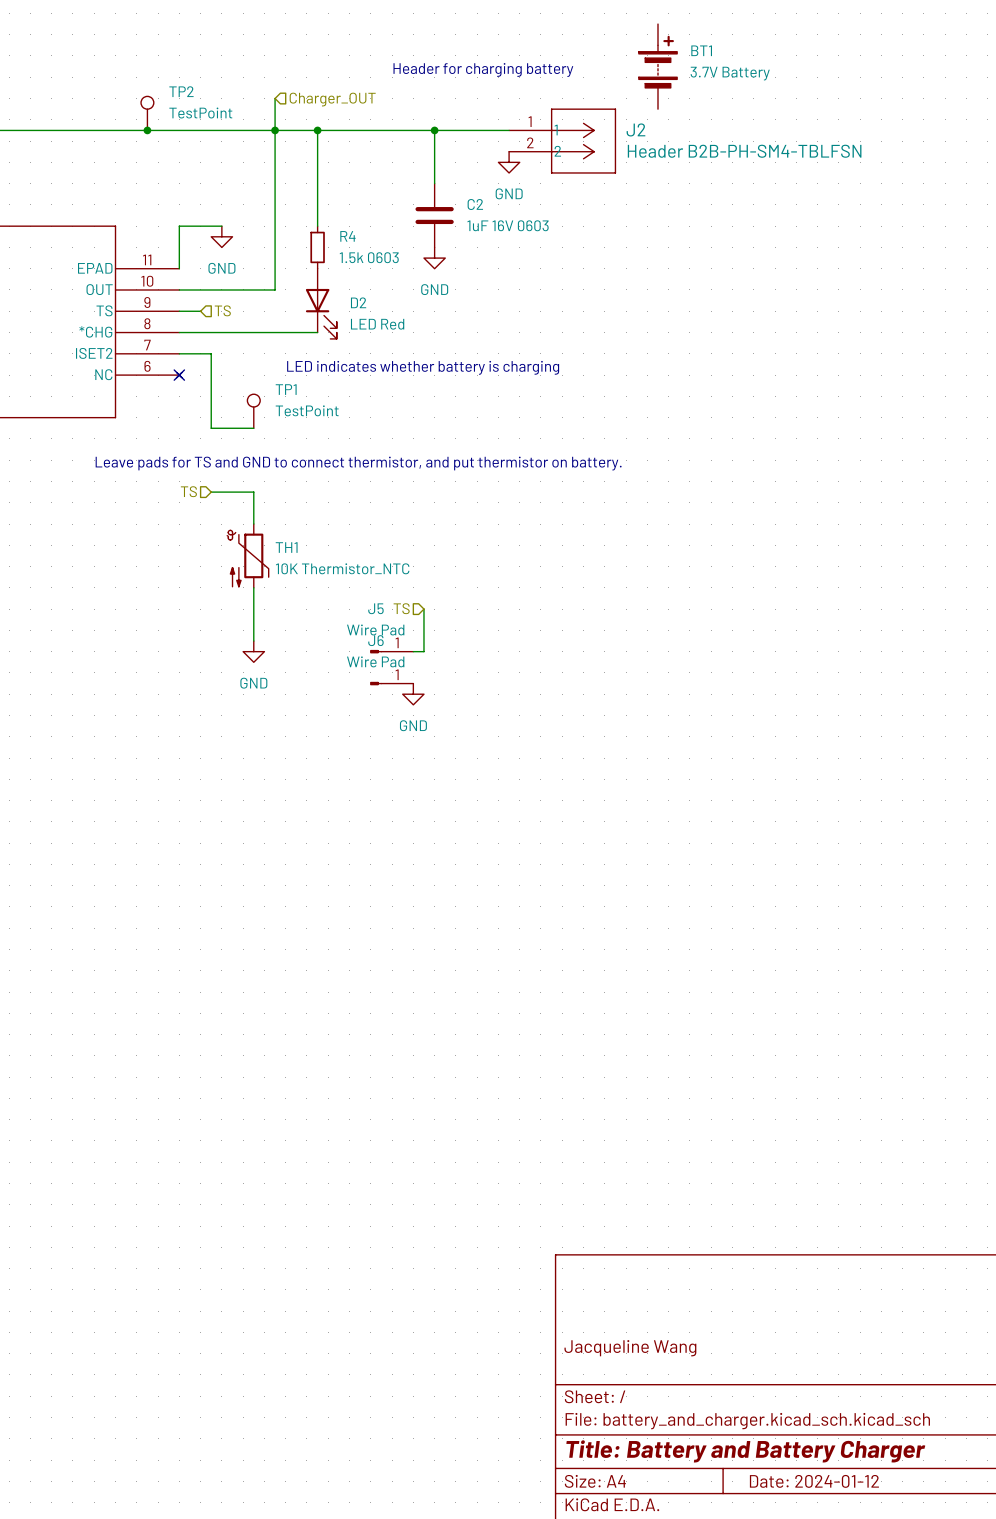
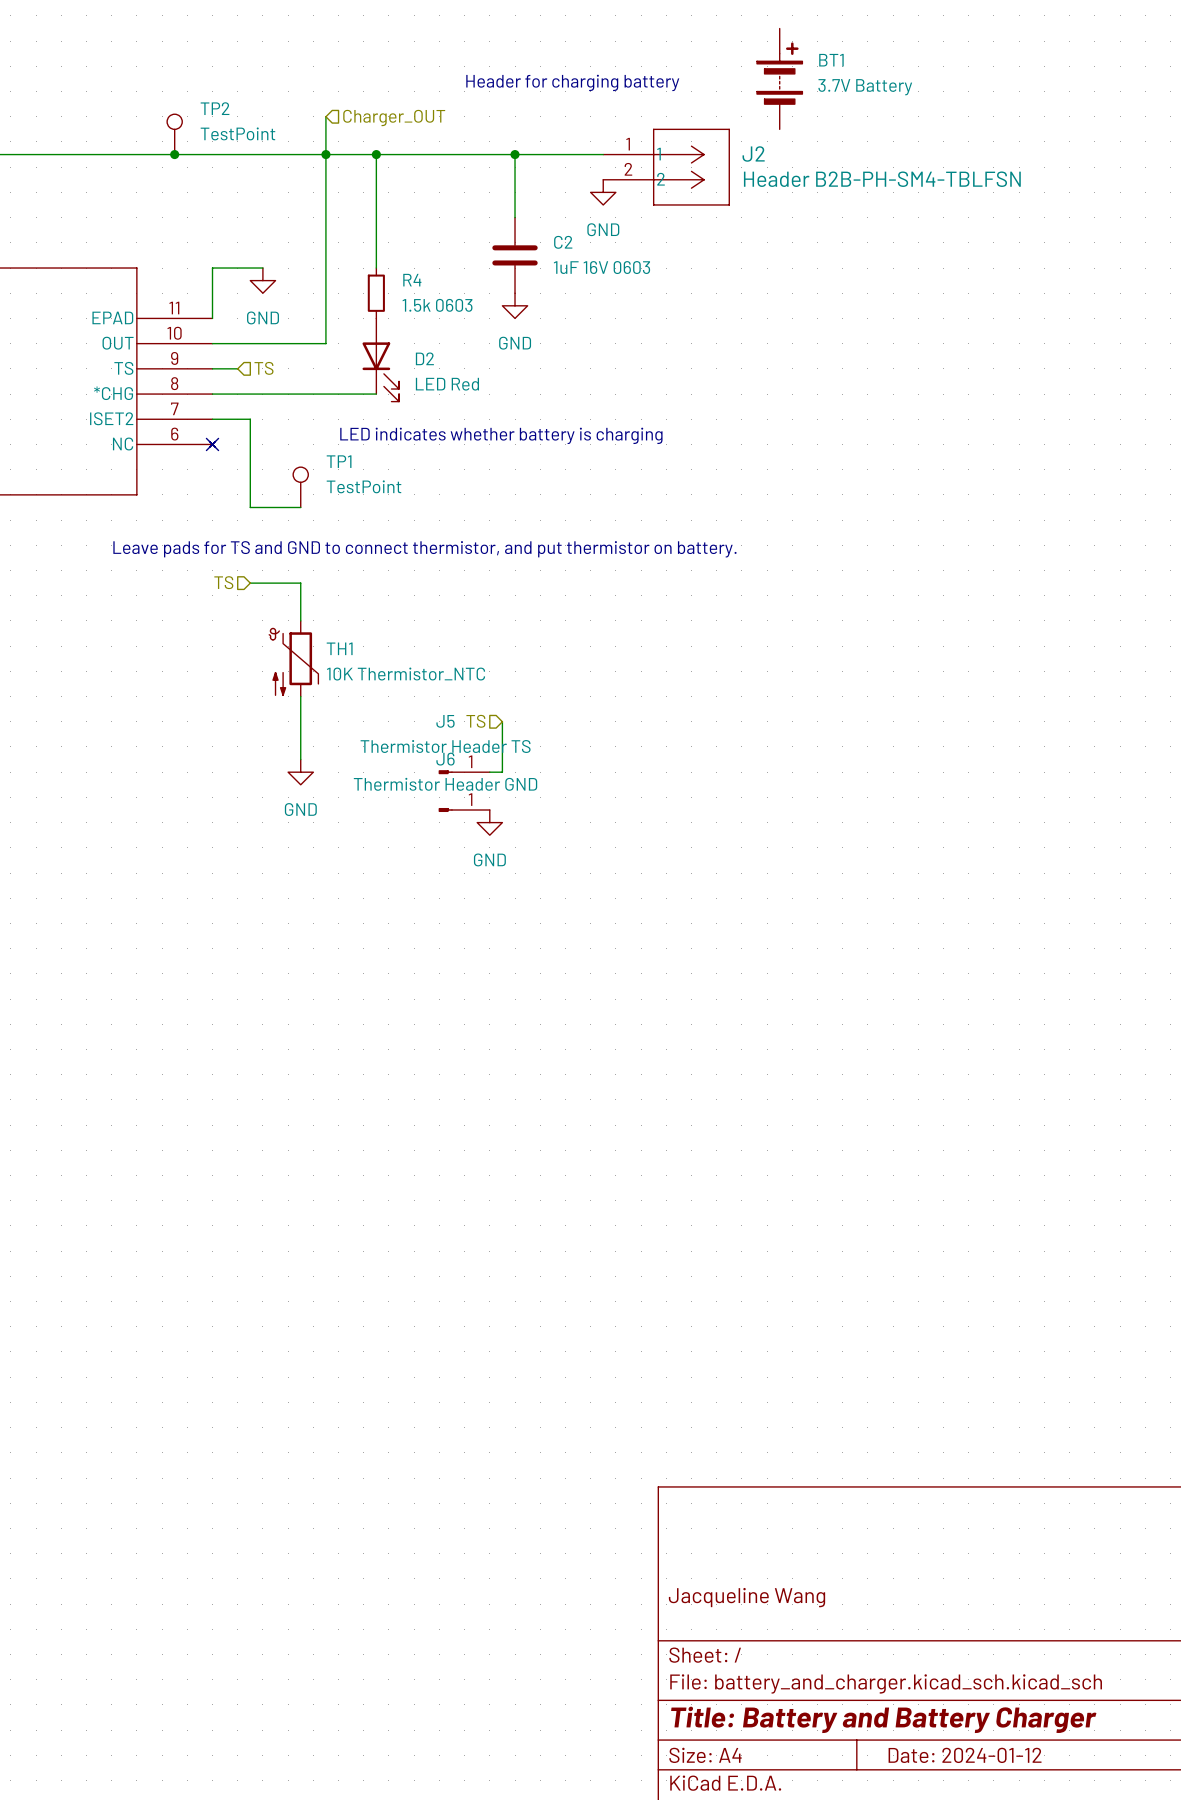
J5 value: Wire Pad (375, 629) -> Thermistor Header TS (445, 746)
J6 value: Wire Pad (375, 661) -> Thermistor Header GND (445, 784)

